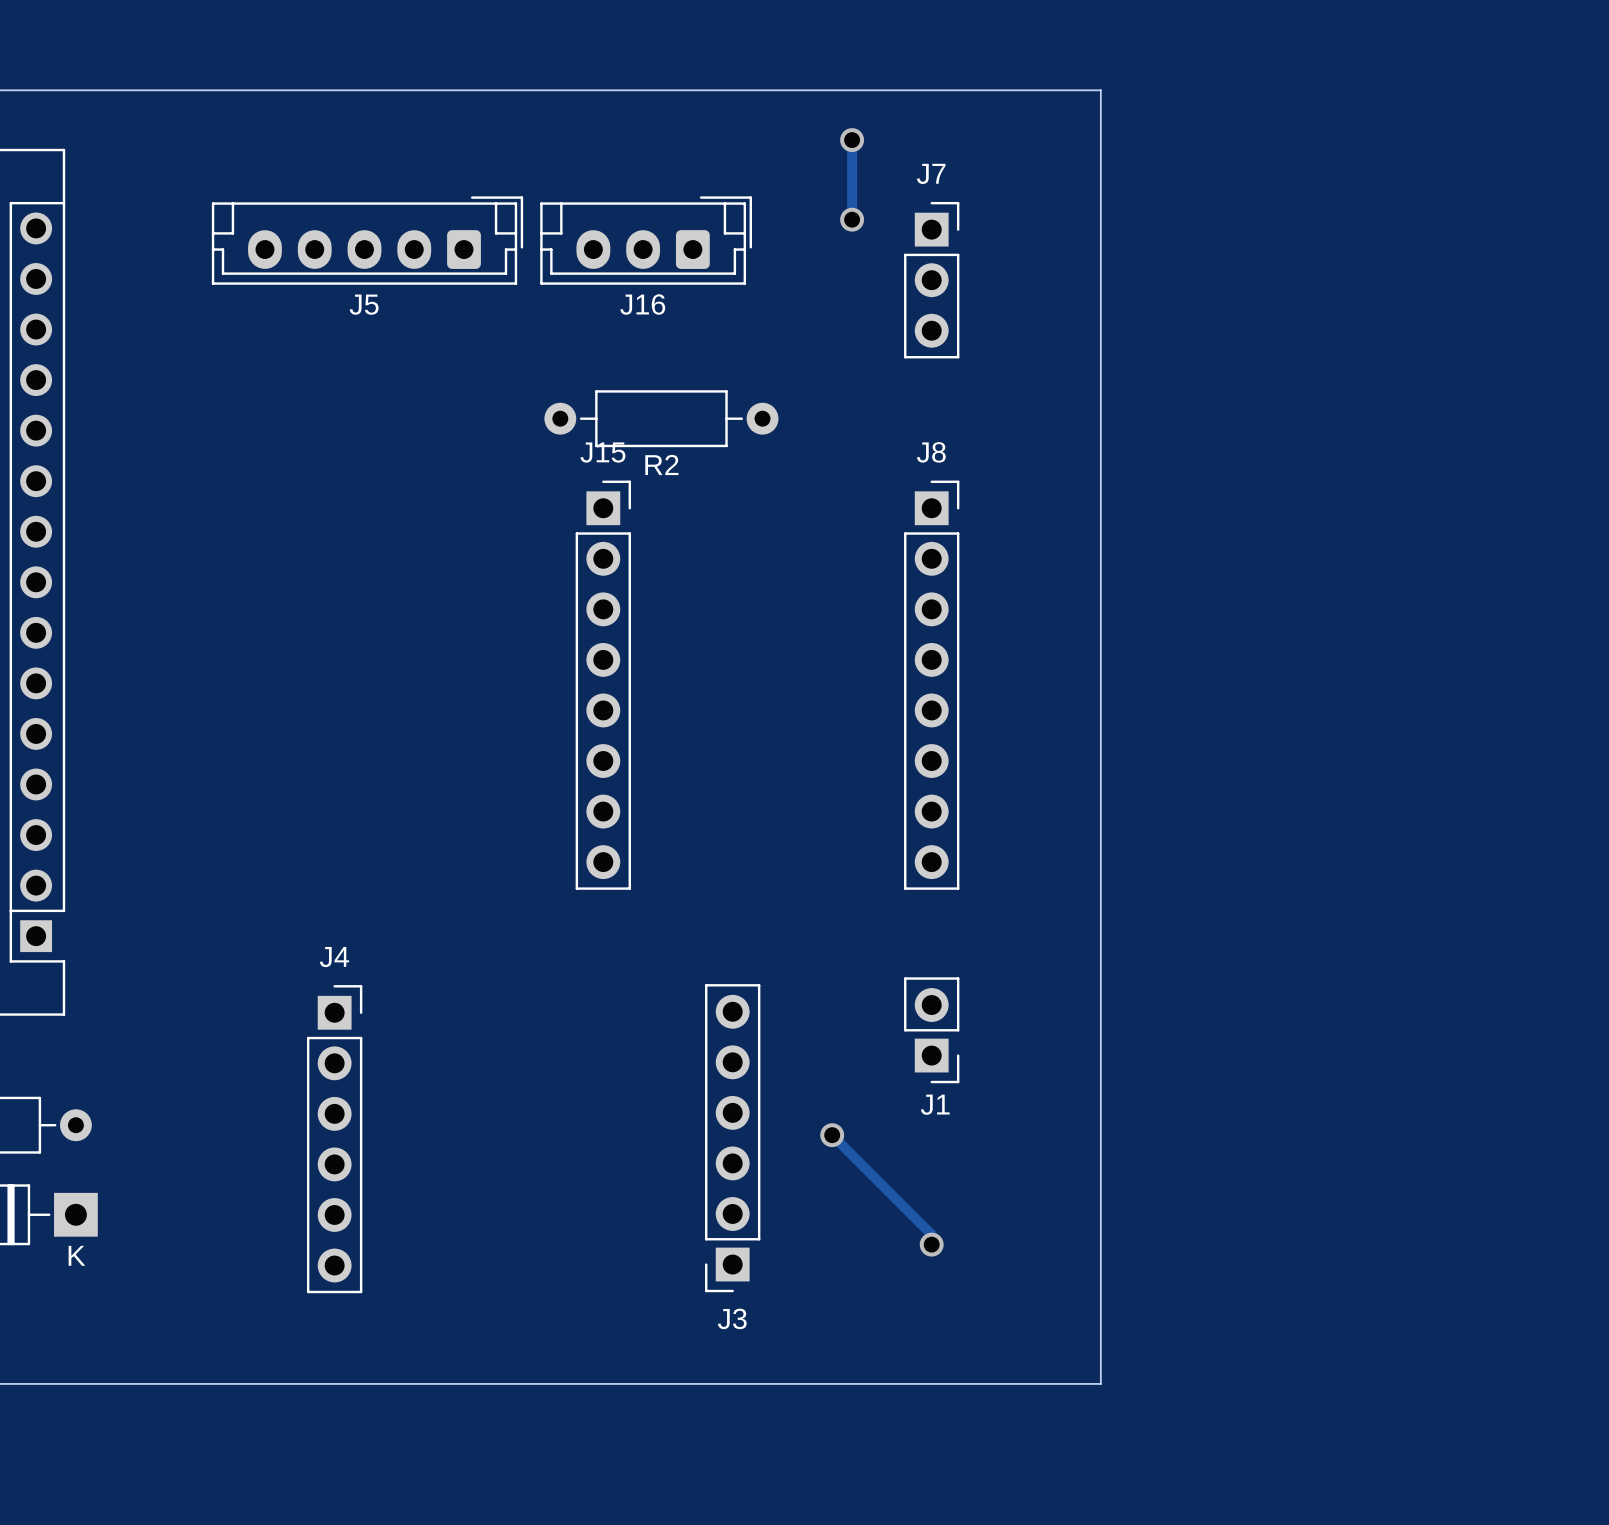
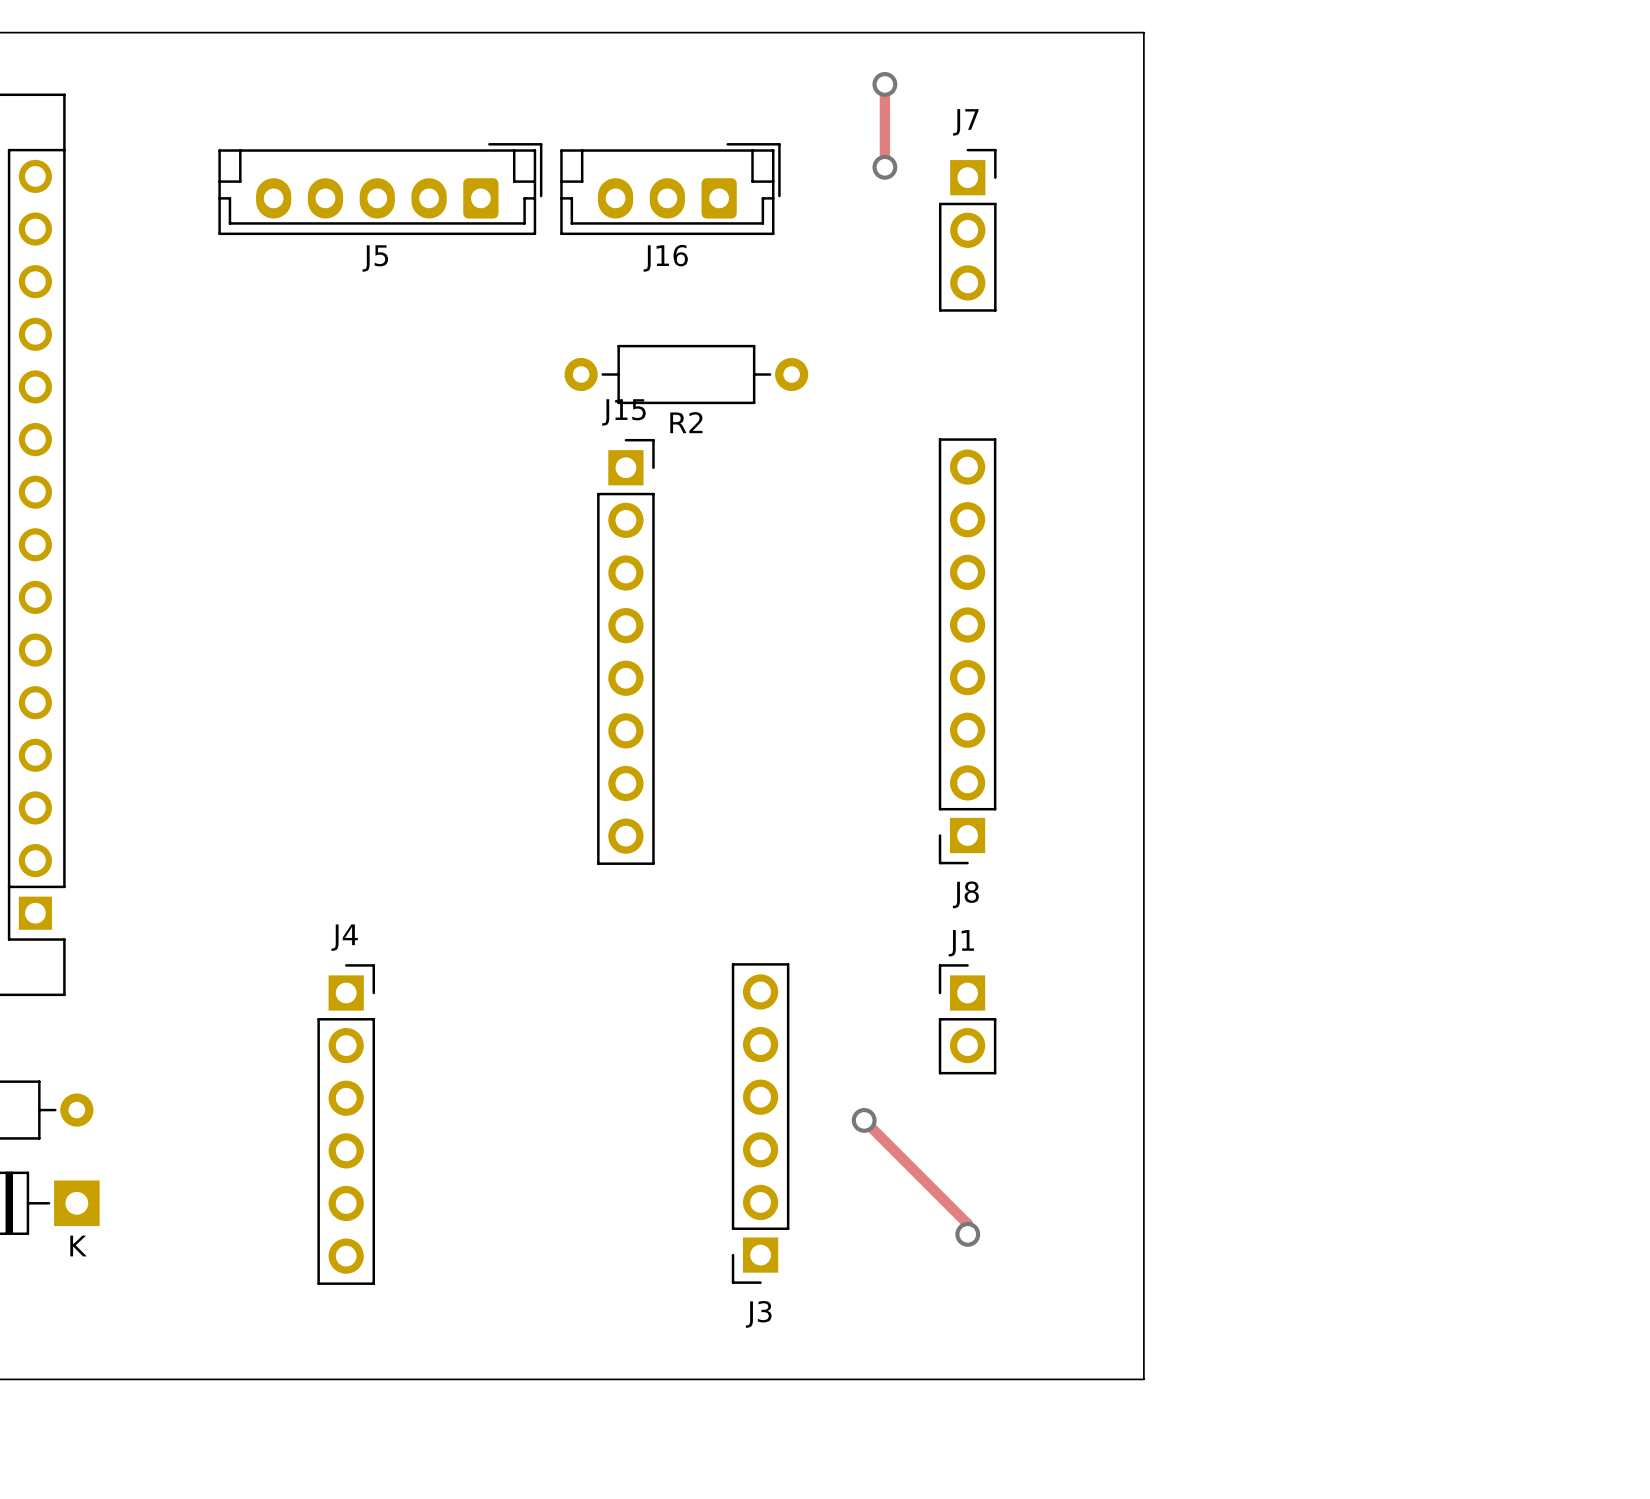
J8 rotation: 0° (931, 685) -> 180° (967, 651)
J1 rotation: 0° (931, 1030) -> 180° (967, 1019)

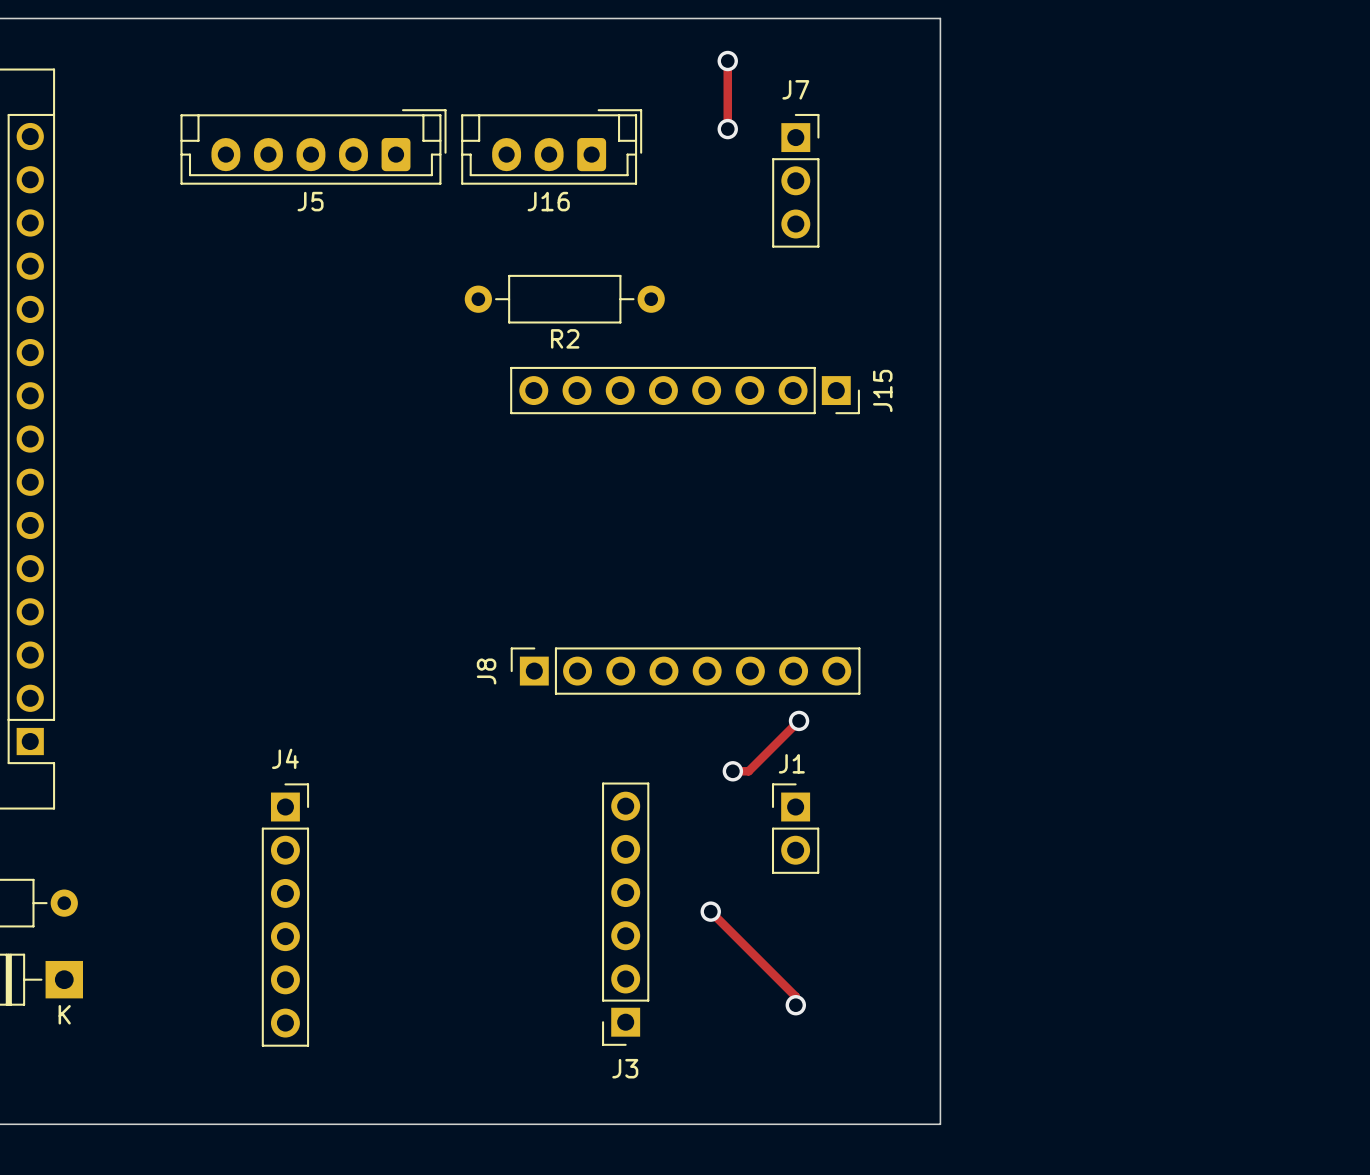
J15 rotation: 0° (625, 651) -> 90° clockwise (685, 390)
J15 position: (625, 651) -> (685, 390)
J8 rotation: 0° (967, 651) -> 90° clockwise (685, 671)
track: none -> (799, 720) (748, 771) (732, 771)
via: none -> (799, 720)
via: none -> (732, 771)

